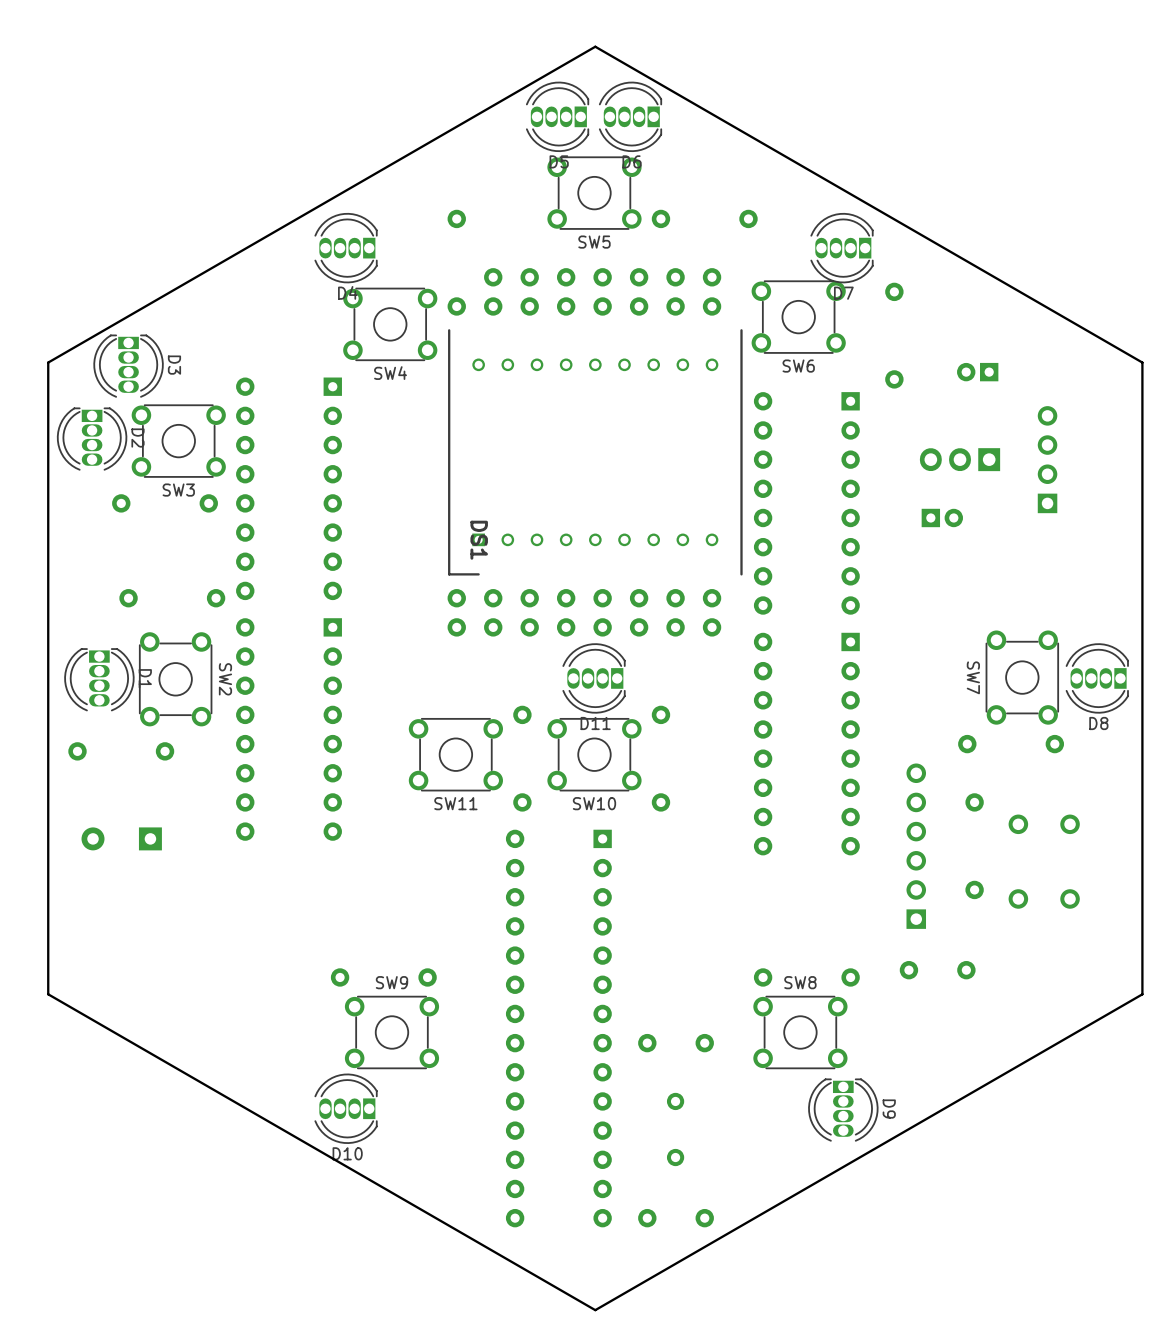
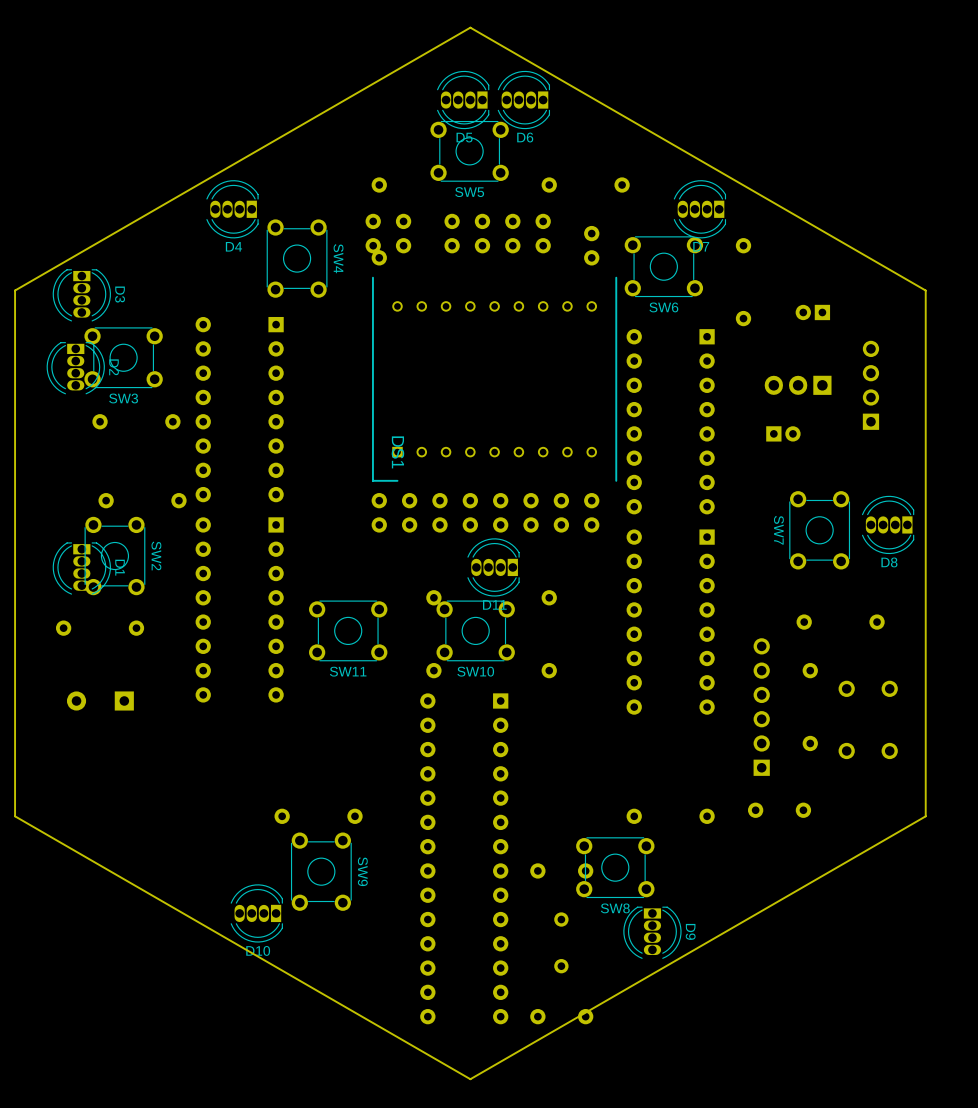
SW5 position: (594, 193) -> (469, 151)
D4 position: (346, 248) -> (232, 209)
part: none -> (373, 233)
part: none -> (452, 233)
part: none -> (482, 233)
part: none -> (512, 233)
part: none -> (543, 233)
part position: (493, 291) -> (403, 233)
part: (529, 291) -> none
part: (566, 291) -> none
part: (602, 291) -> none
part: (639, 291) -> none
part: (675, 291) -> none
SW4 rotation: 0° (390, 324) -> 90° clockwise (297, 258)
D3 position: (128, 366) -> (81, 295)
SW4 name position: SW4 (390, 373) -> SW4 (338, 258)
SW3 position: (178, 441) -> (123, 357)
SW7 position: (1022, 677) -> (819, 530)
D8 position: (1097, 678) -> (888, 524)
SW2 position: (175, 679) -> (114, 556)
SW11 position: (455, 754) -> (348, 630)
SW10 position: (594, 754) -> (475, 630)
SW8 name position: SW8 (800, 982) -> SW8 (615, 908)
board edge: (48, 994) (48, 362) (595, 46) (1142, 362) (1142, 994) (595, 1310) (566, 1293) -> (39, 830) (15, 816) (15, 290) (470, 27) (925, 290) (925, 816) (470, 1079)
SW9 rotation: 0° (391, 1032) -> 90° clockwise (321, 871)
SW8 position: (800, 1032) -> (615, 867)
D10 position: (346, 1108) -> (256, 913)
D9 position: (843, 1110) -> (652, 932)

